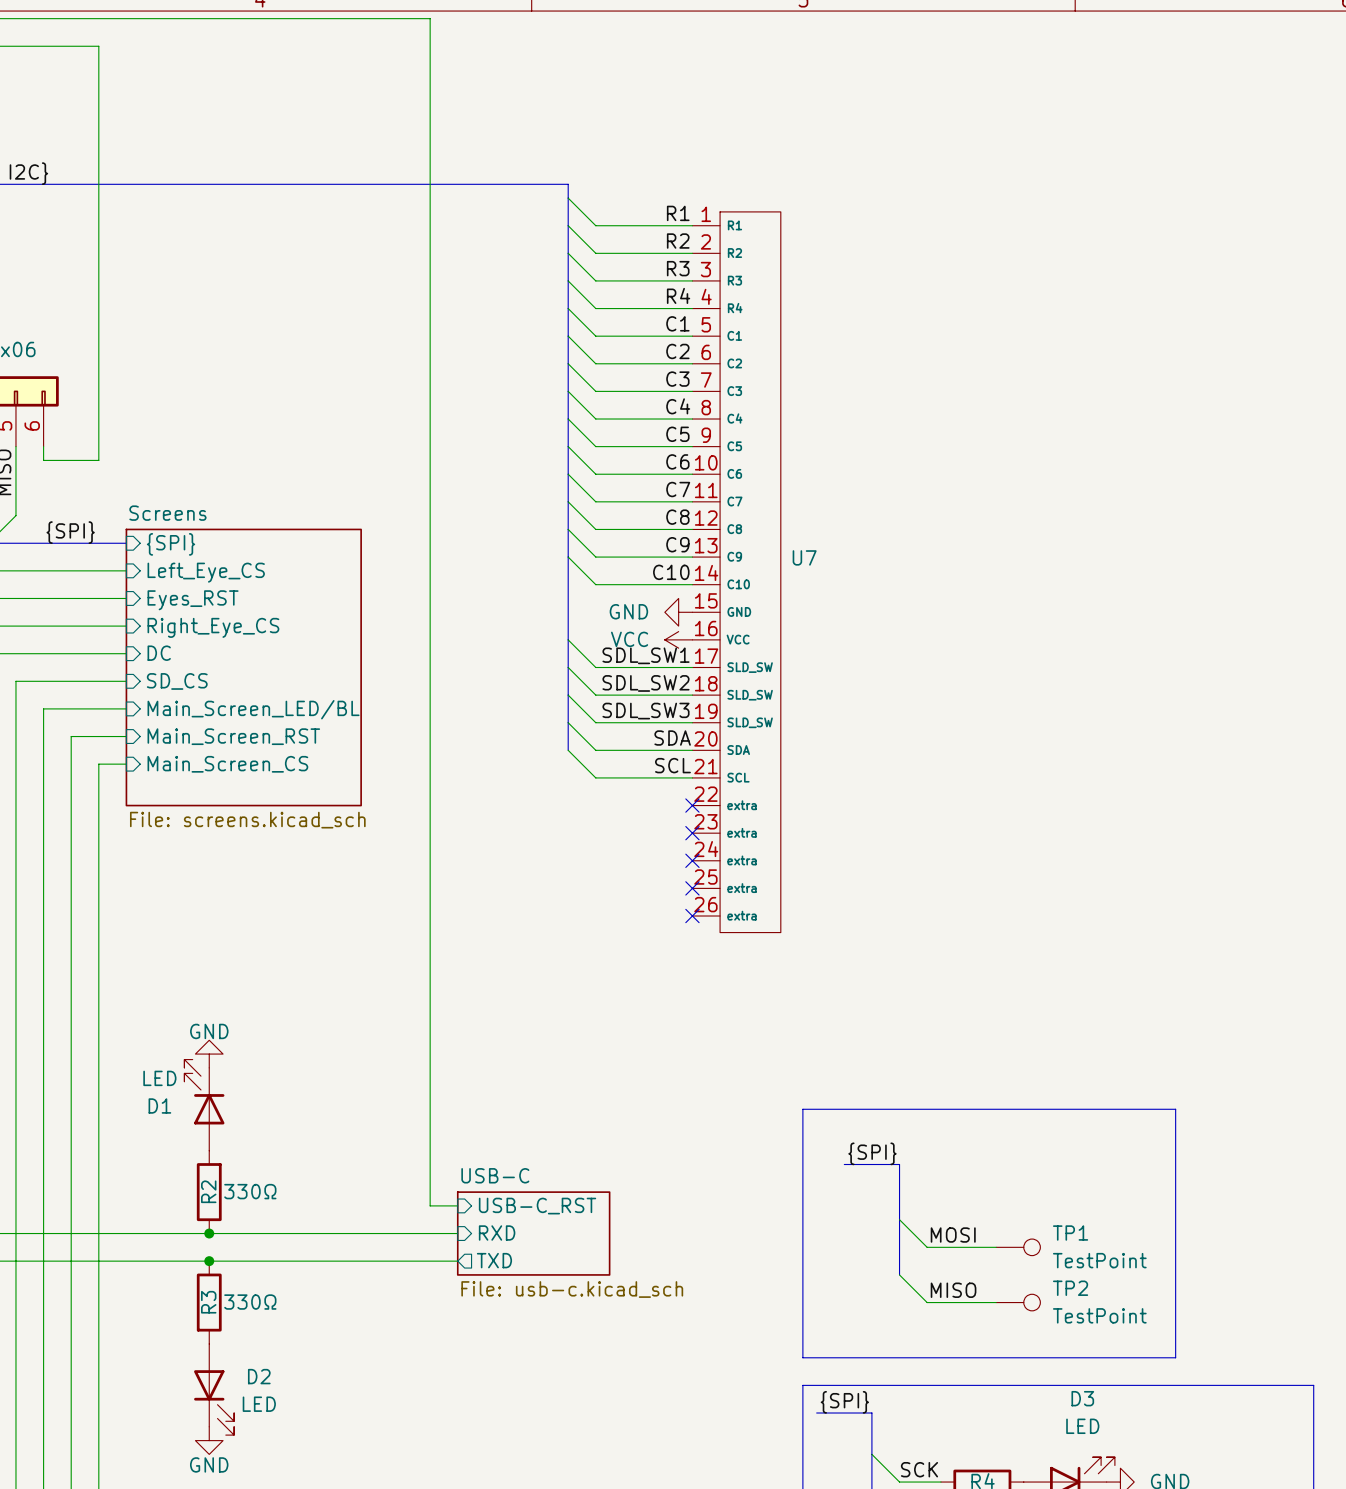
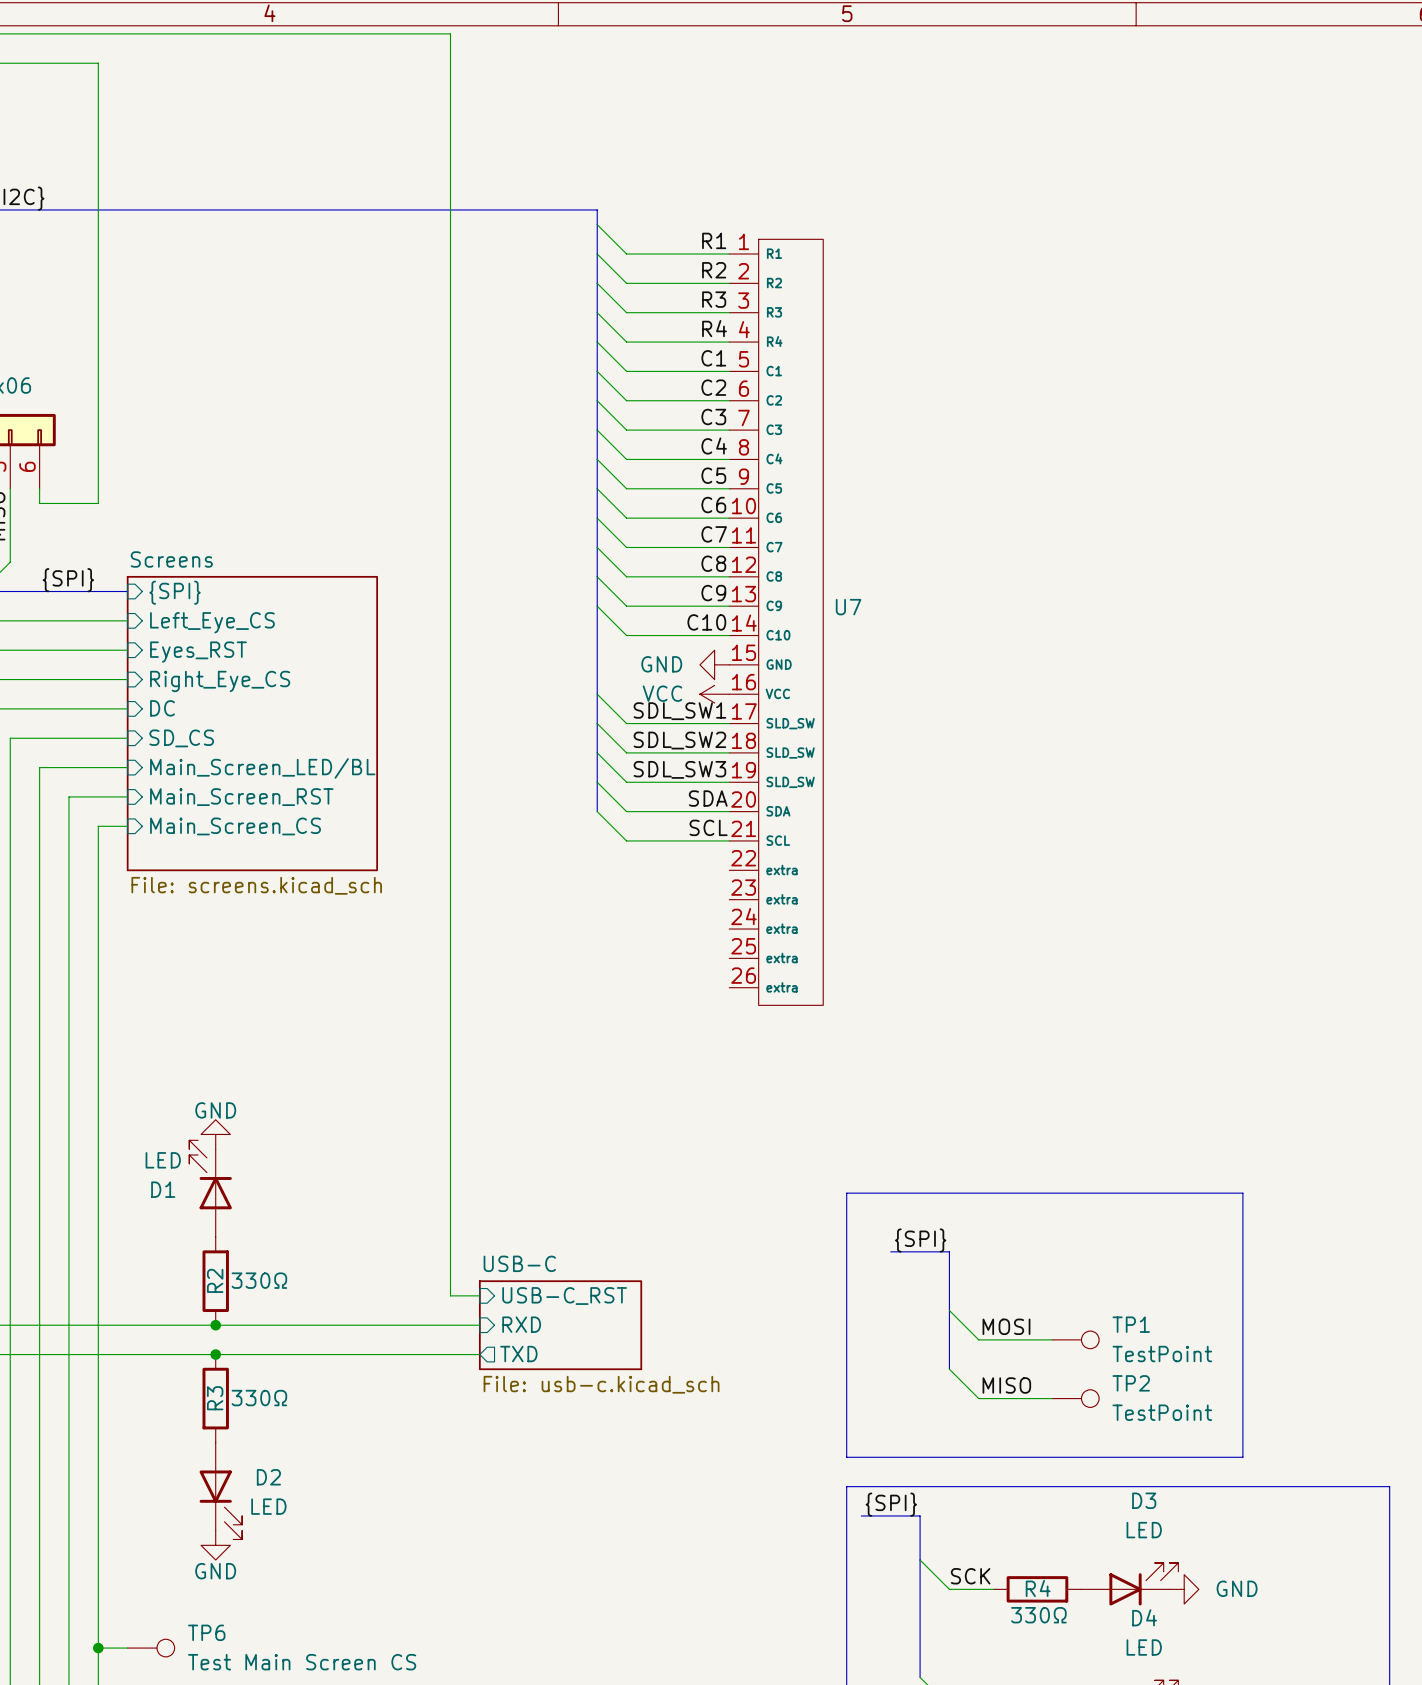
no-connect mark: (692, 805) -> none
no-connect mark: (692, 833) -> none
no-connect mark: (692, 860) -> none
no-connect mark: (692, 888) -> none
no-connect mark: (692, 916) -> none

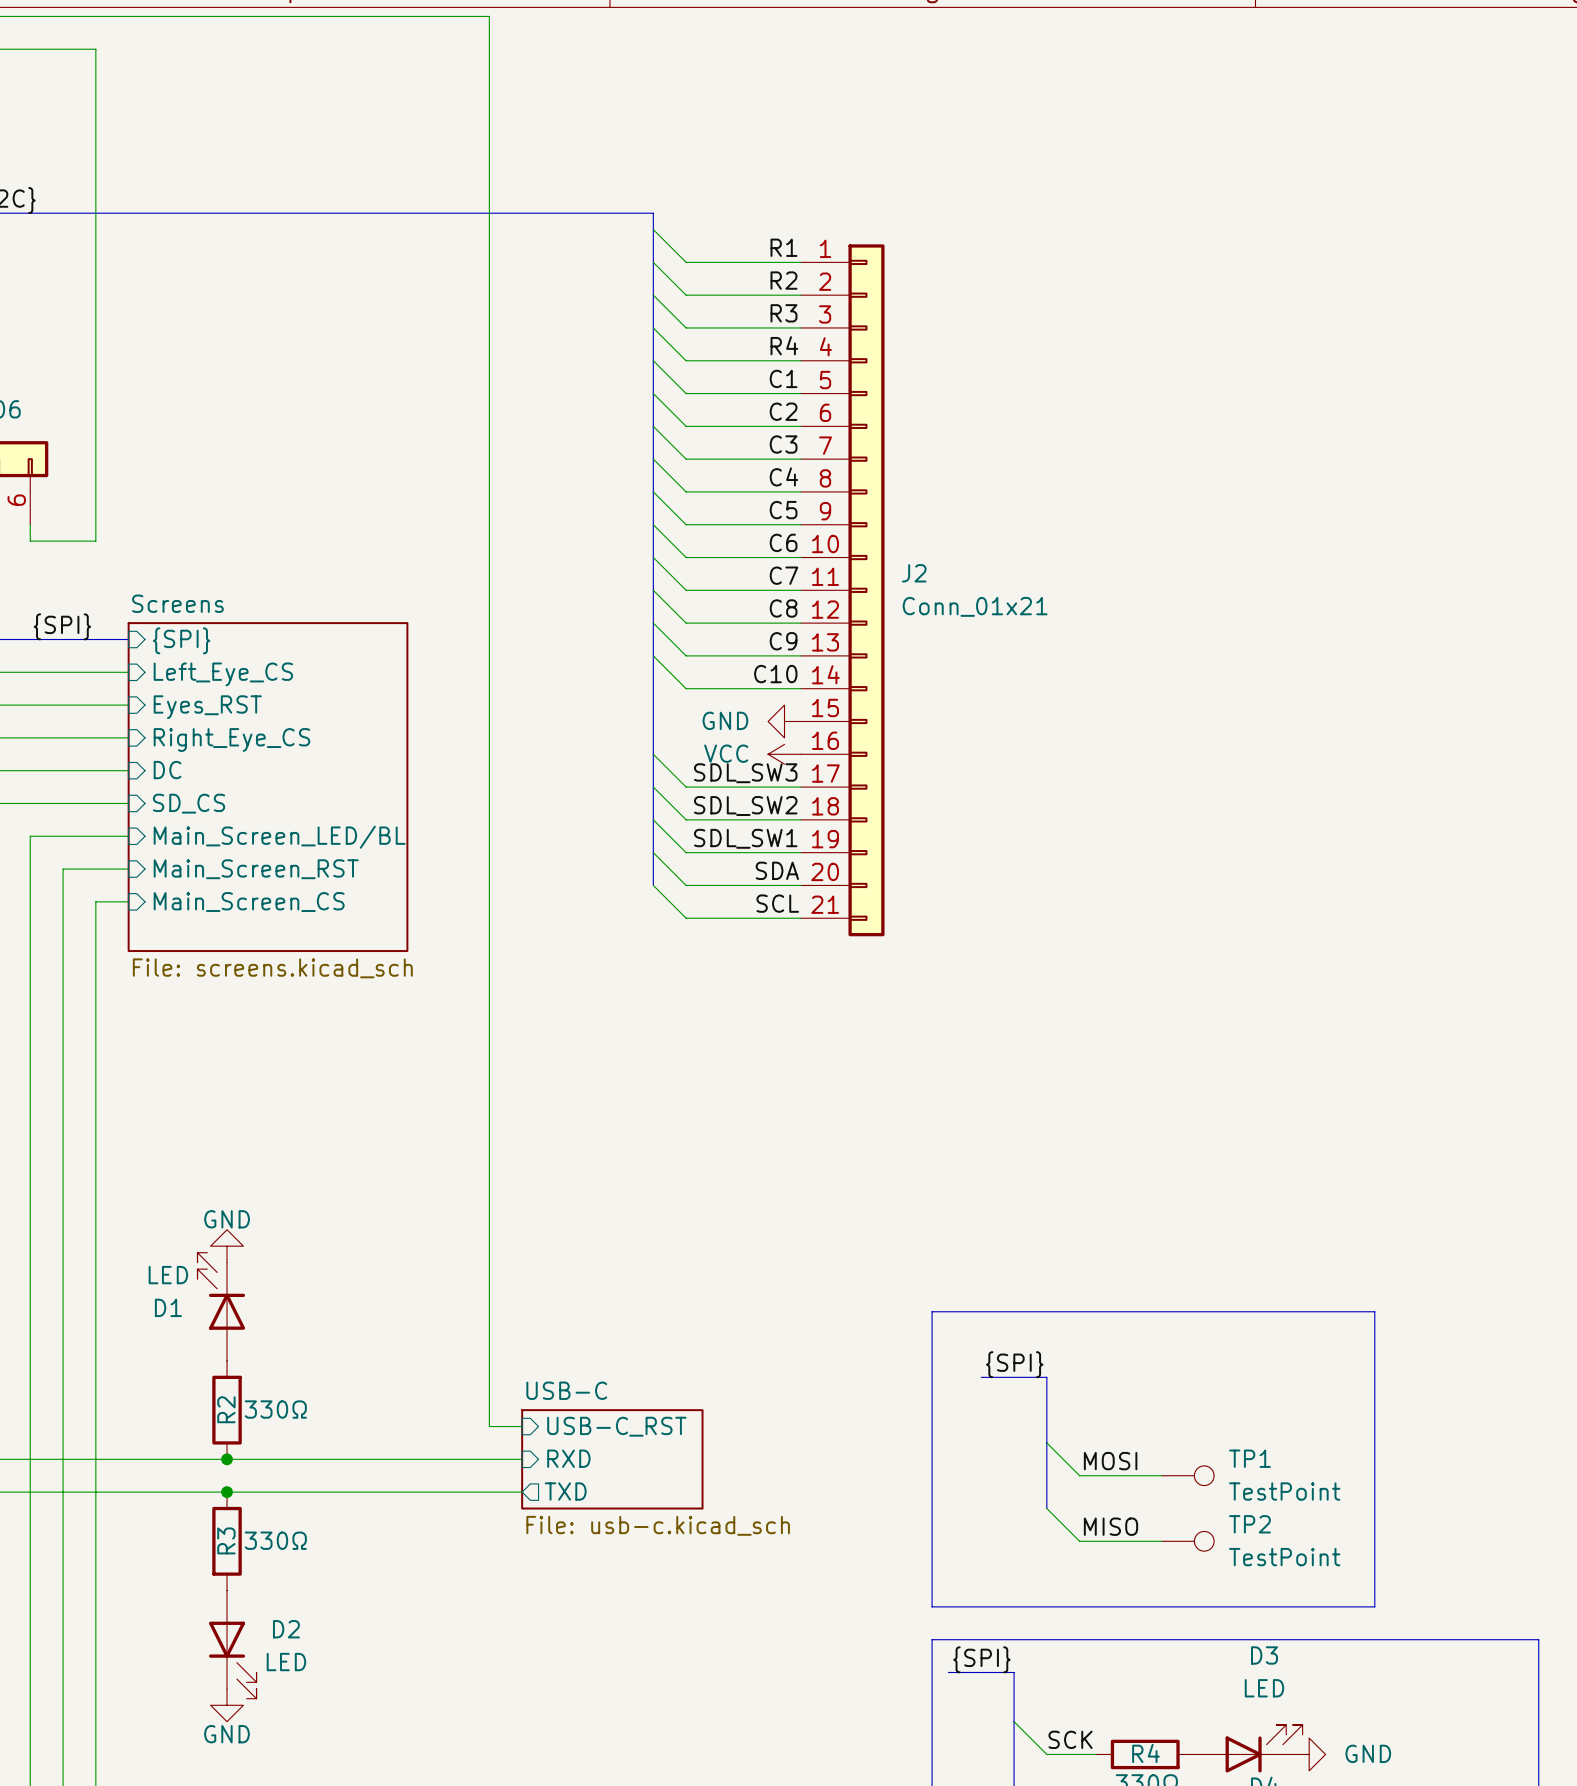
J2: none -> Conn_01x21 (842, 590)
U7: (776, 622) -> none
label: SDL_SW1 (679, 711) -> SDL_SW3 (745, 773)
label: SDL_SW3 (679, 769) -> SDL_SW1 (745, 838)

